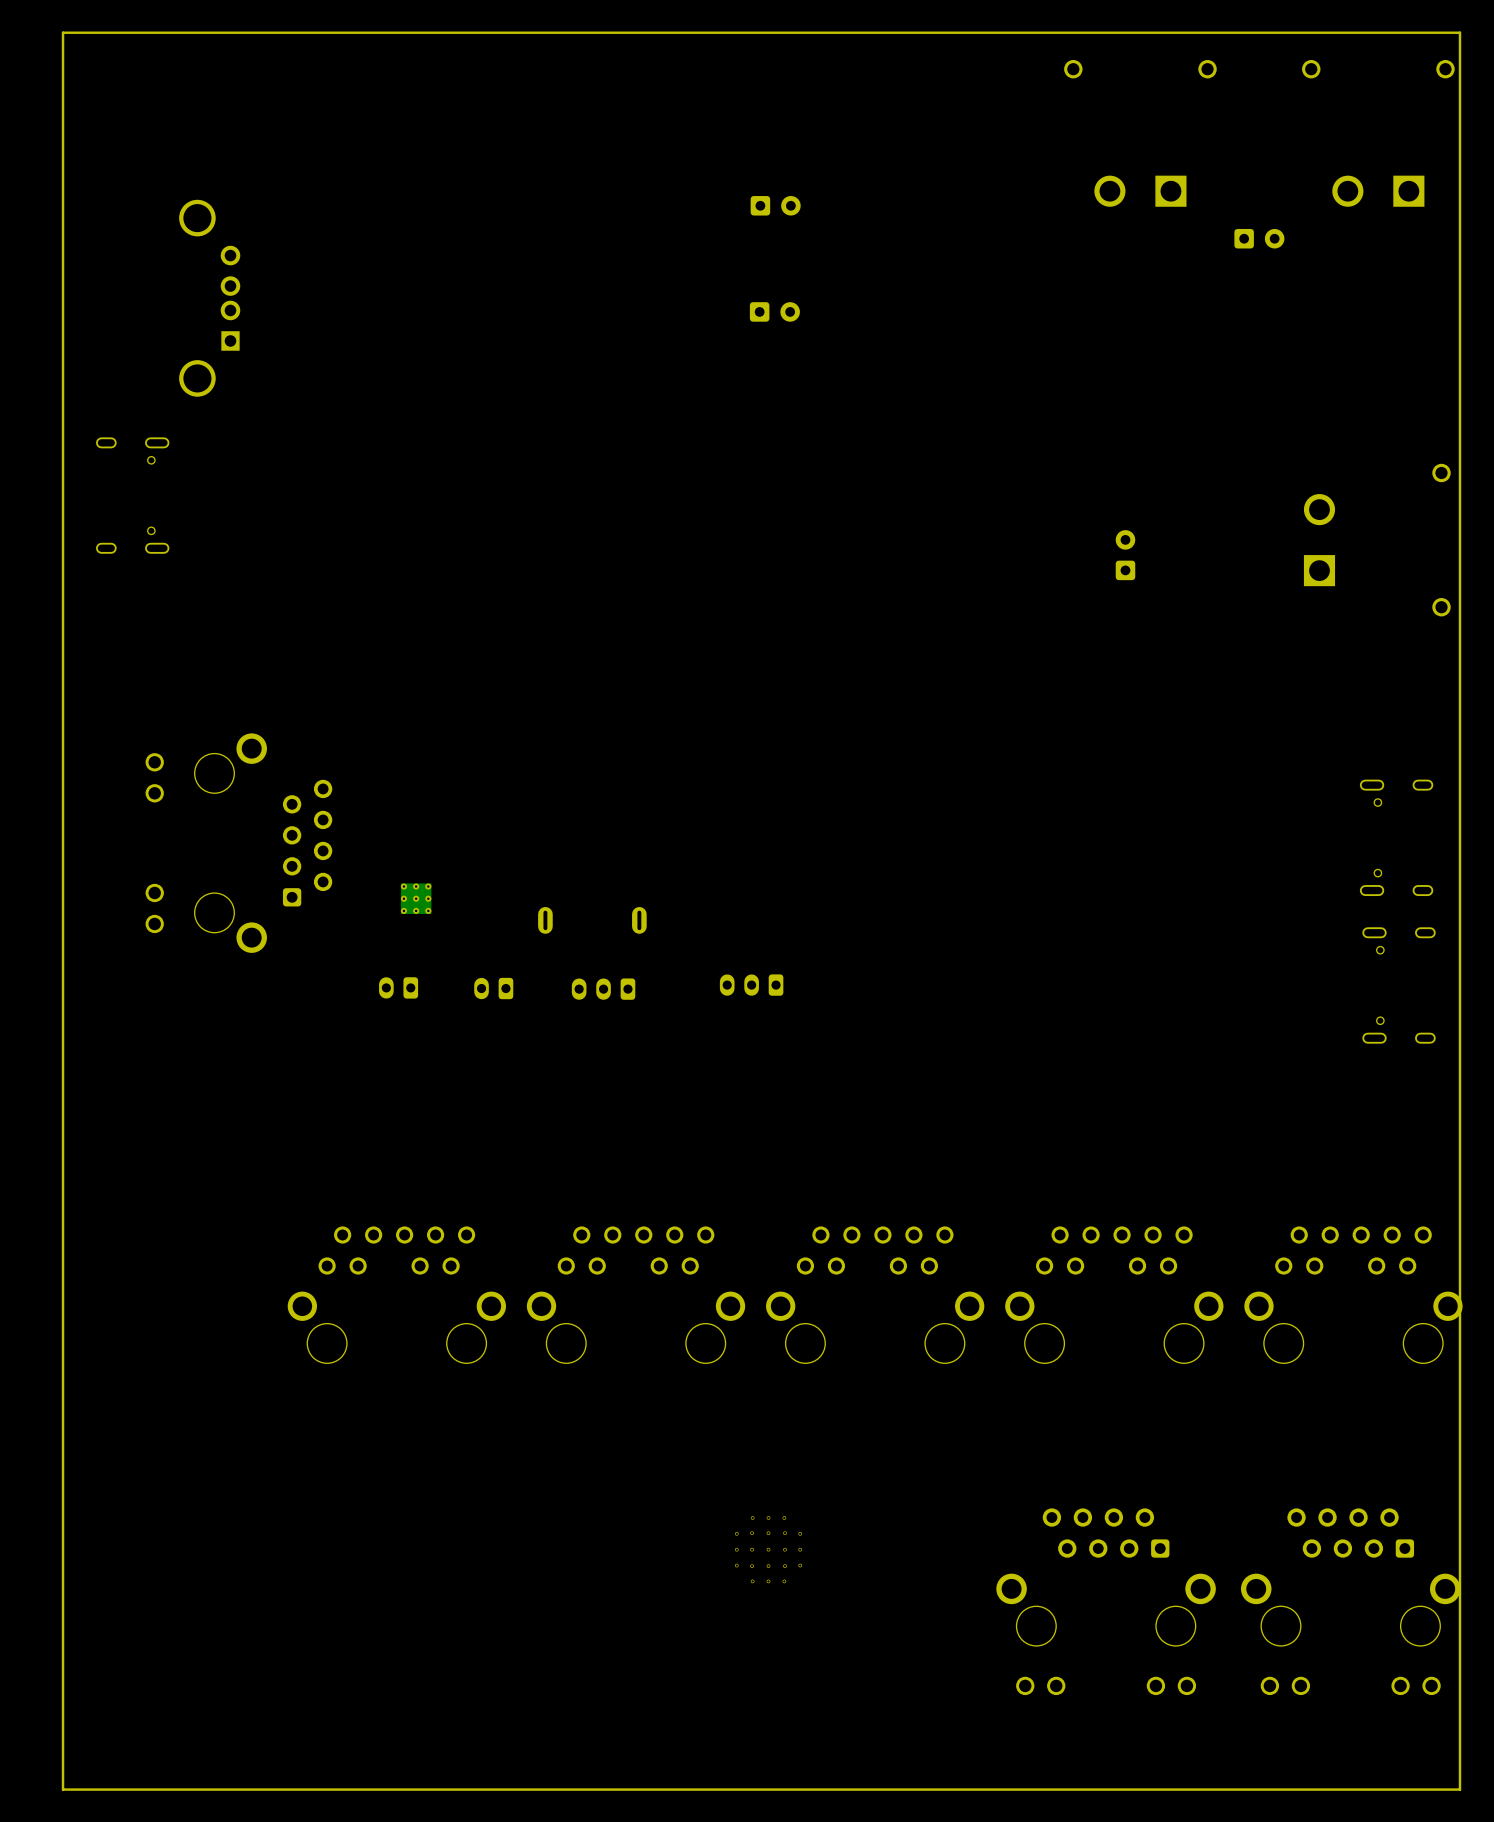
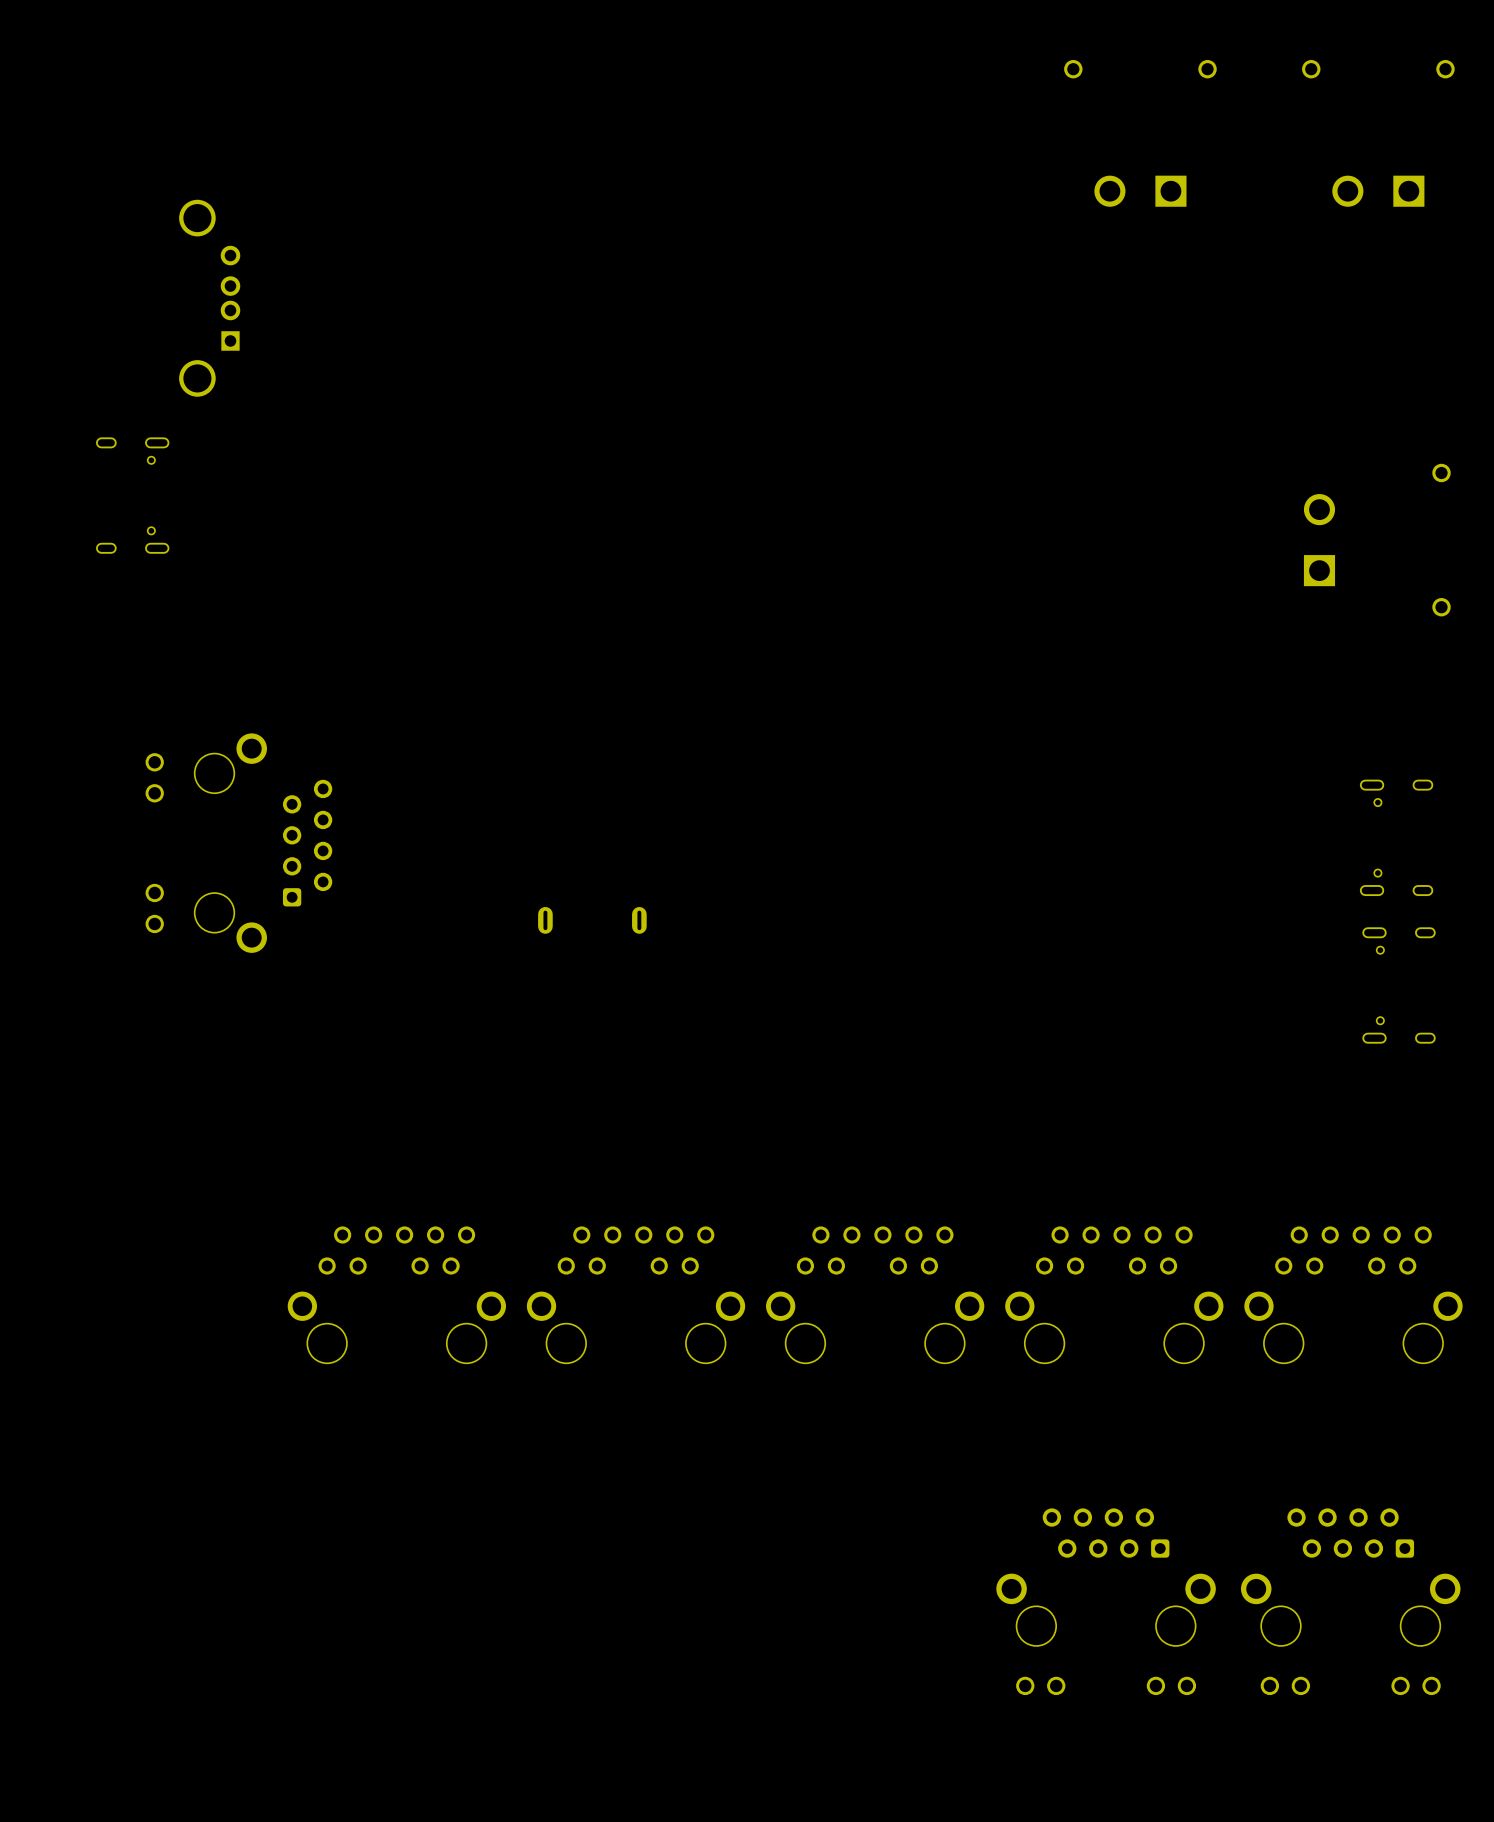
board edge: (1459, 32) (63, 32) (63, 1789) (1459, 1789) (1459, 32) -> none
part: (775, 205) -> none
part: (1259, 238) -> none
part: (774, 311) -> none
part: (1125, 555) -> none
part: (416, 898) -> none
part: (751, 985) -> none
part: (398, 987) -> none
part: (493, 988) -> none
part: (603, 989) -> none
part: (768, 1549) -> none

